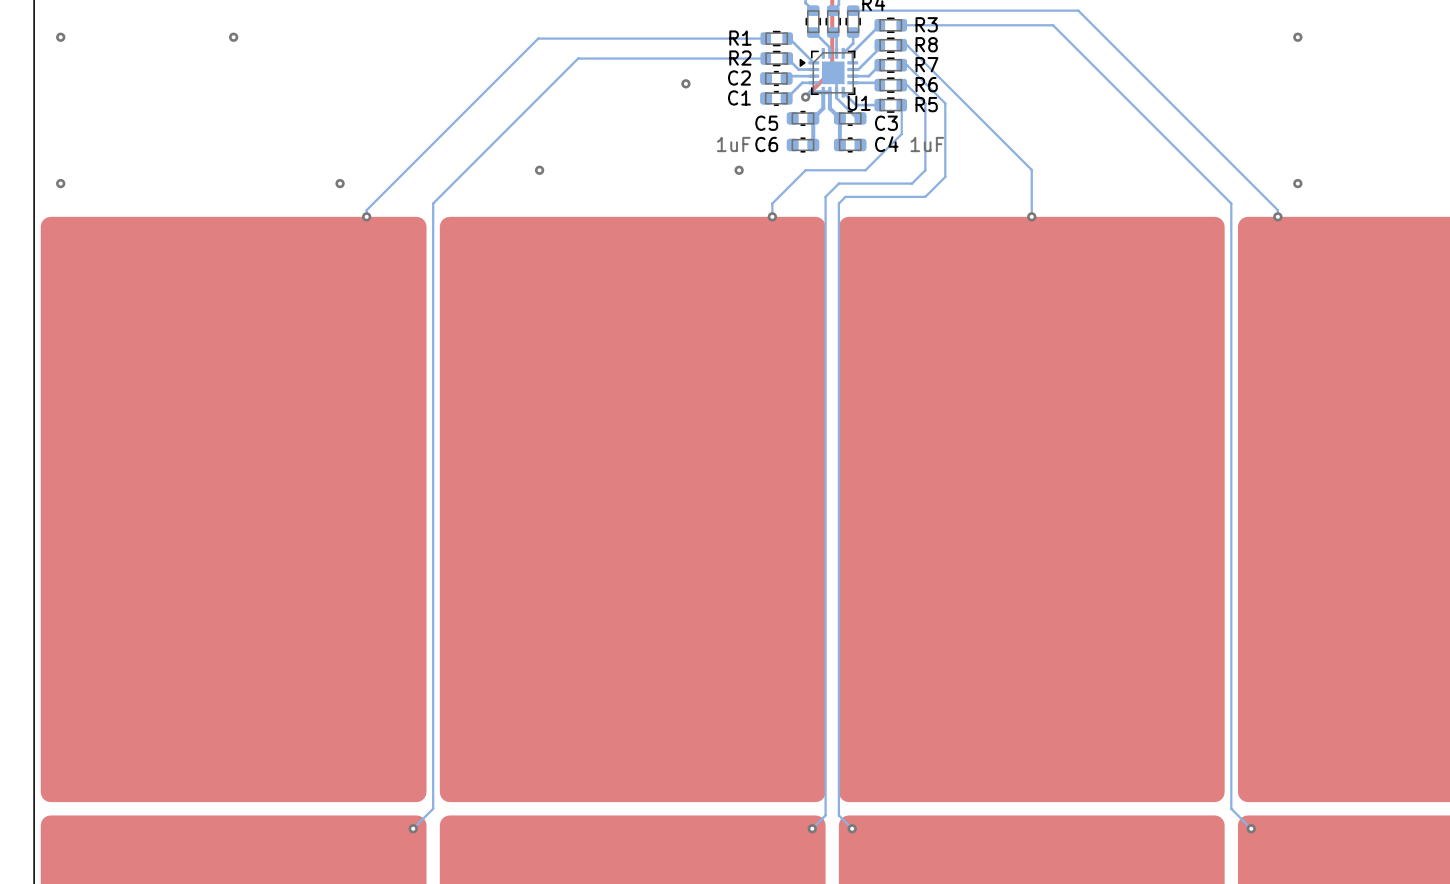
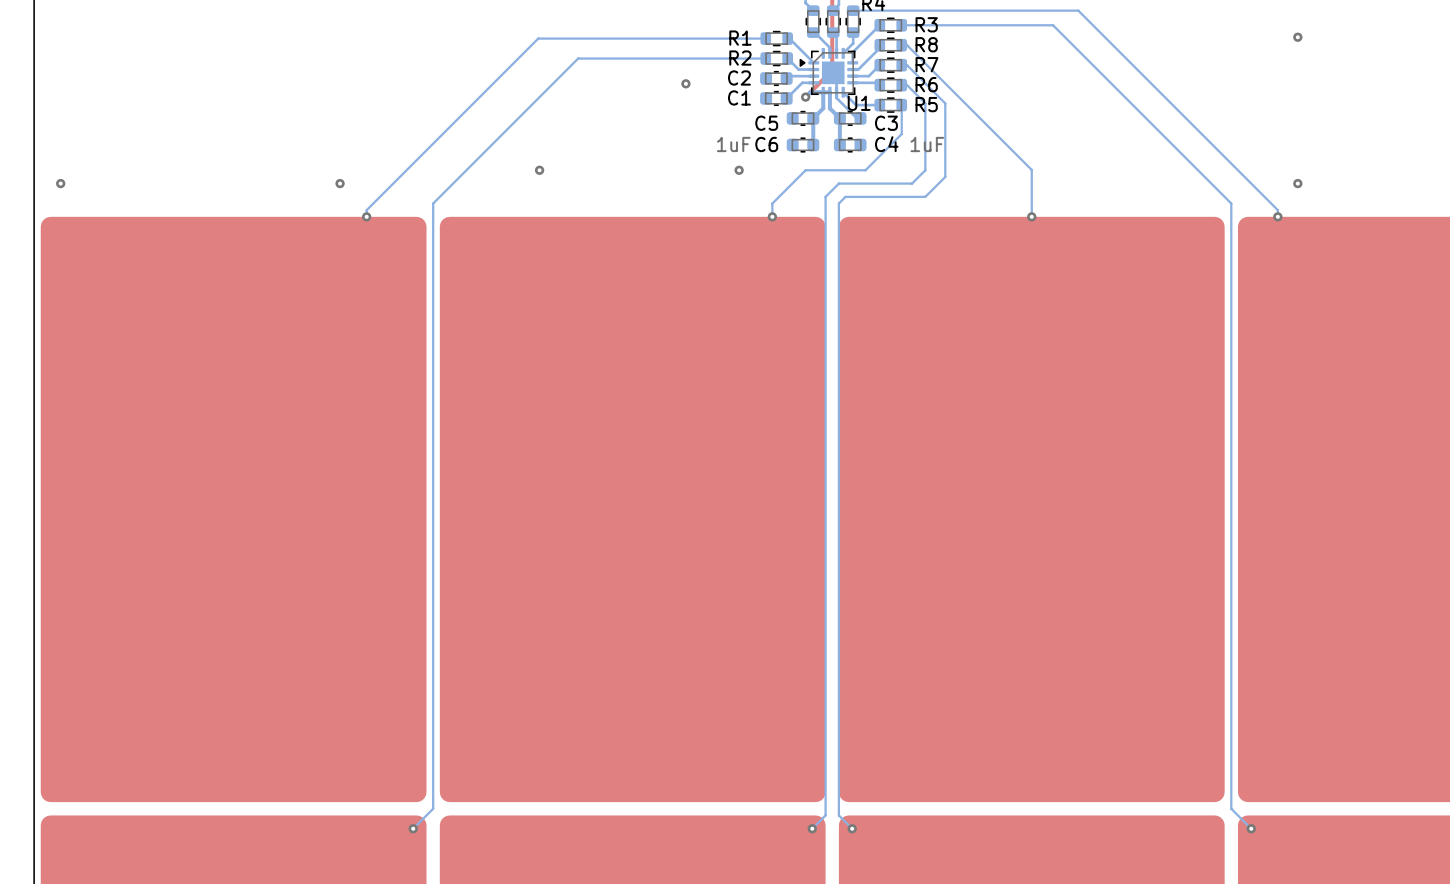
via: (60, 37) -> none
via: (233, 37) -> none

